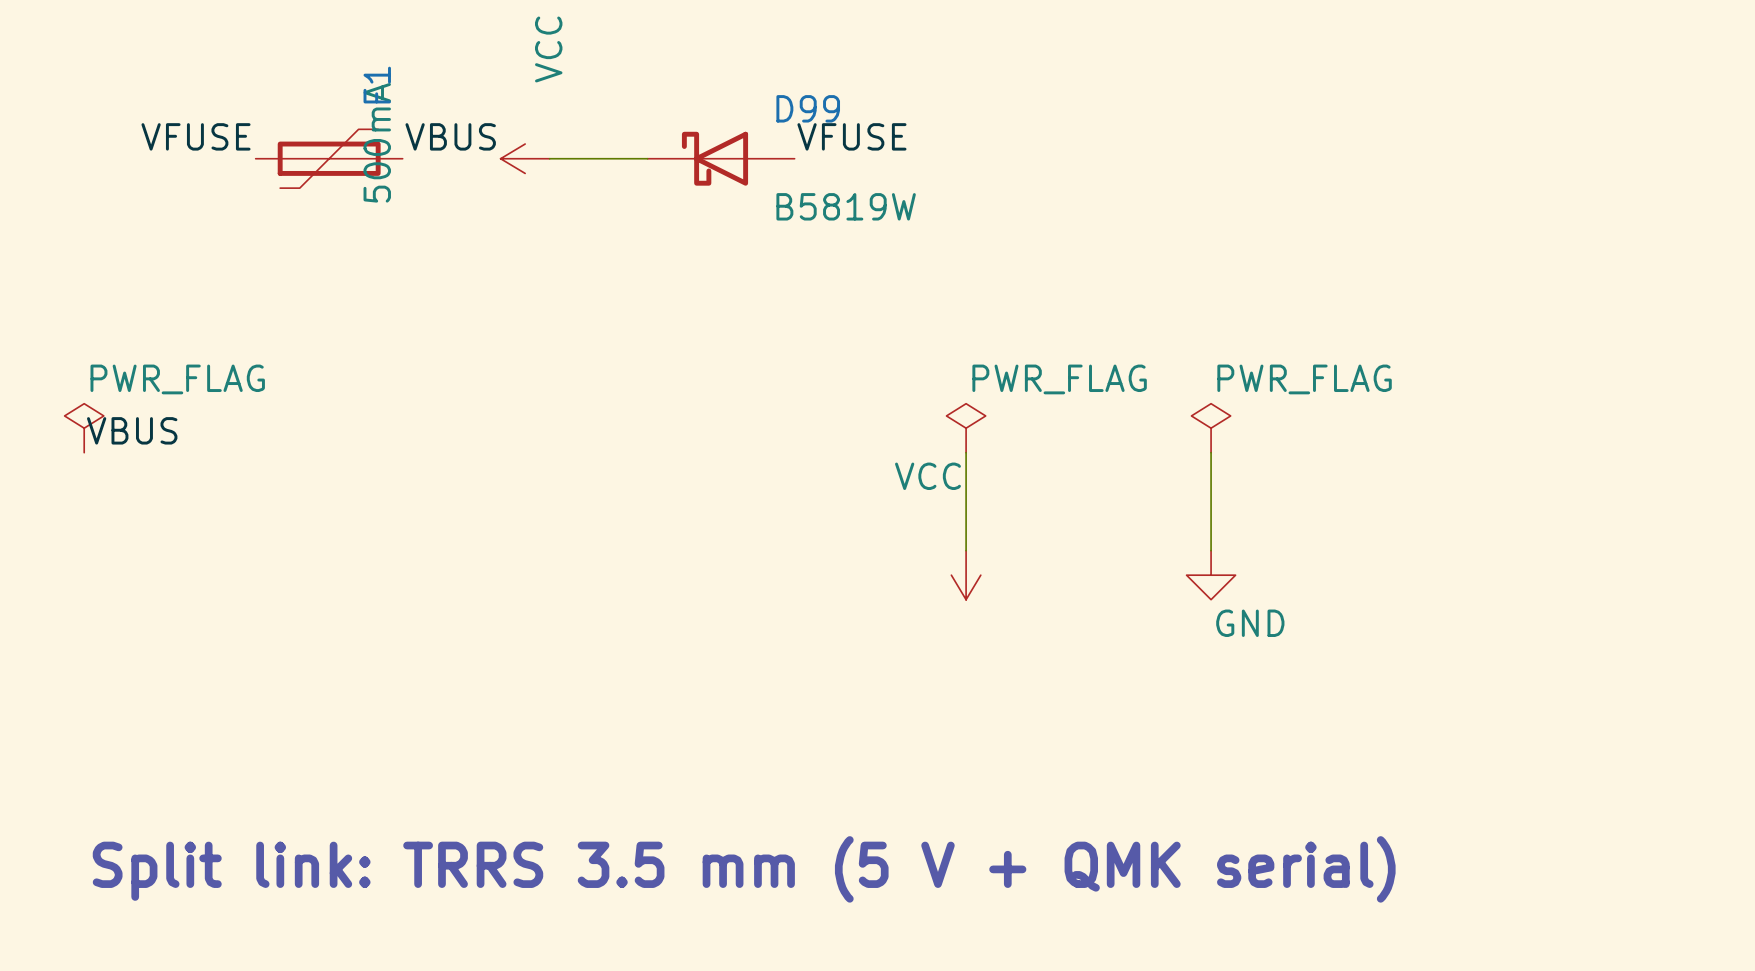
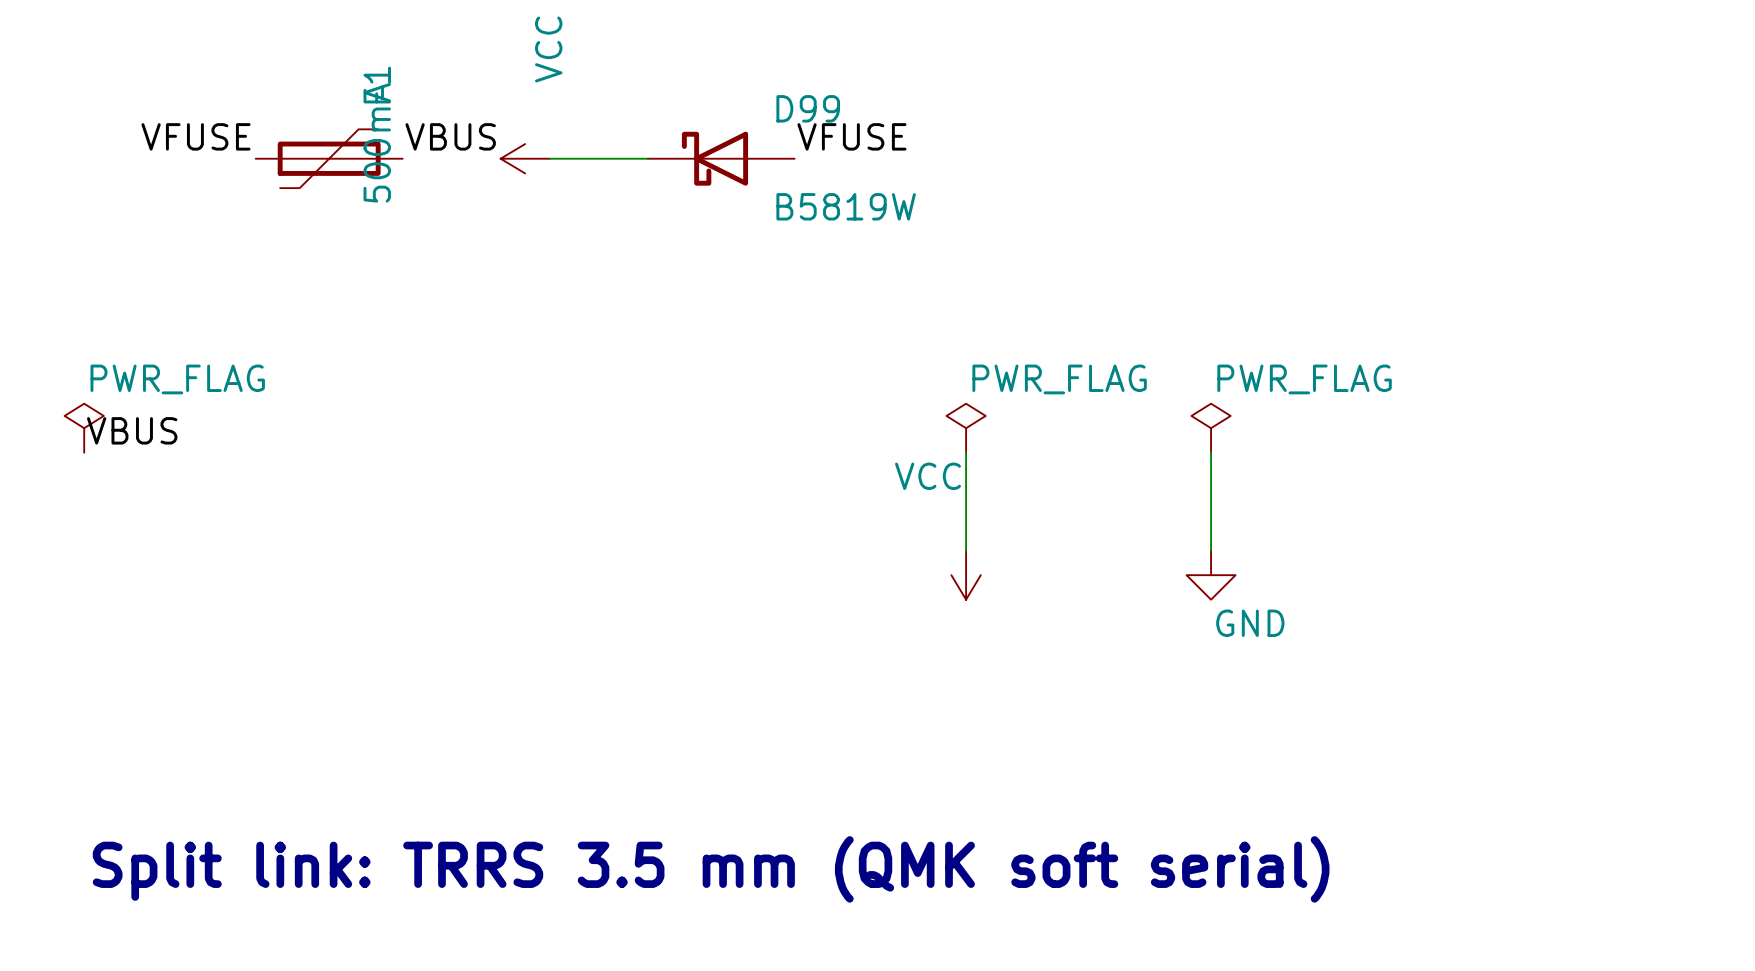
text: Split link: TRRS 3.5 mm (5 V + QMK serial) (744, 869) -> Split link: TRRS 3.5 mm (QMK soft serial) (711, 869)

